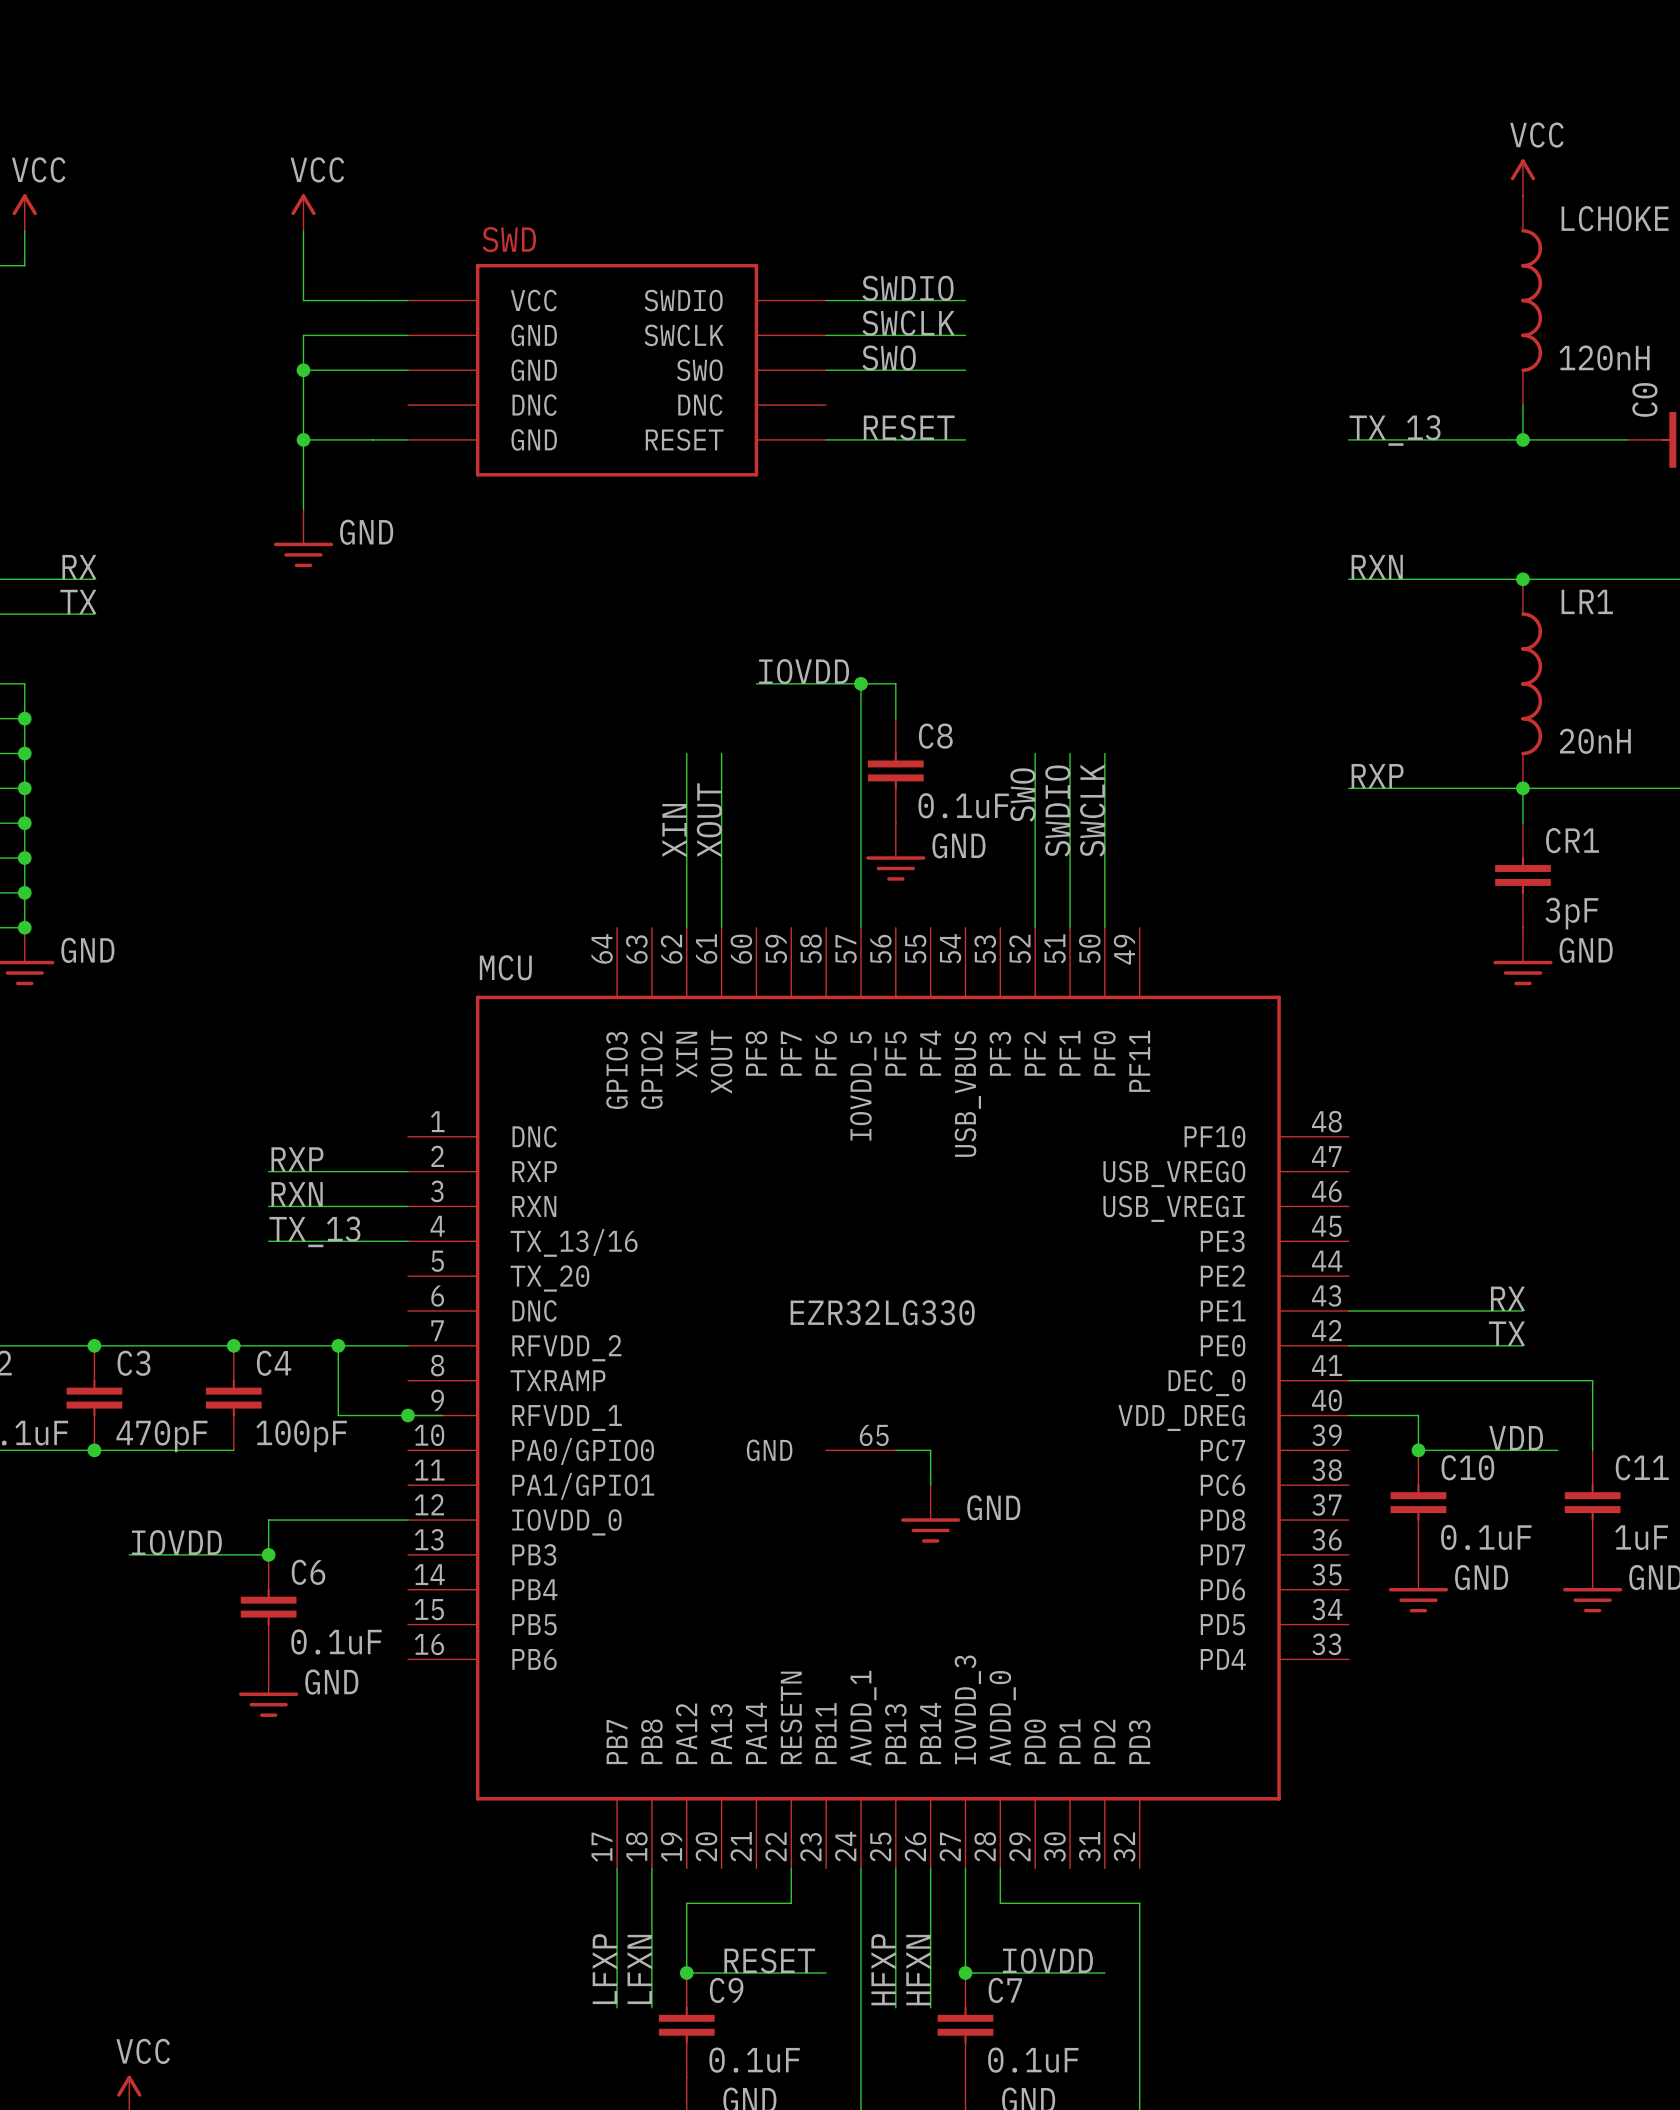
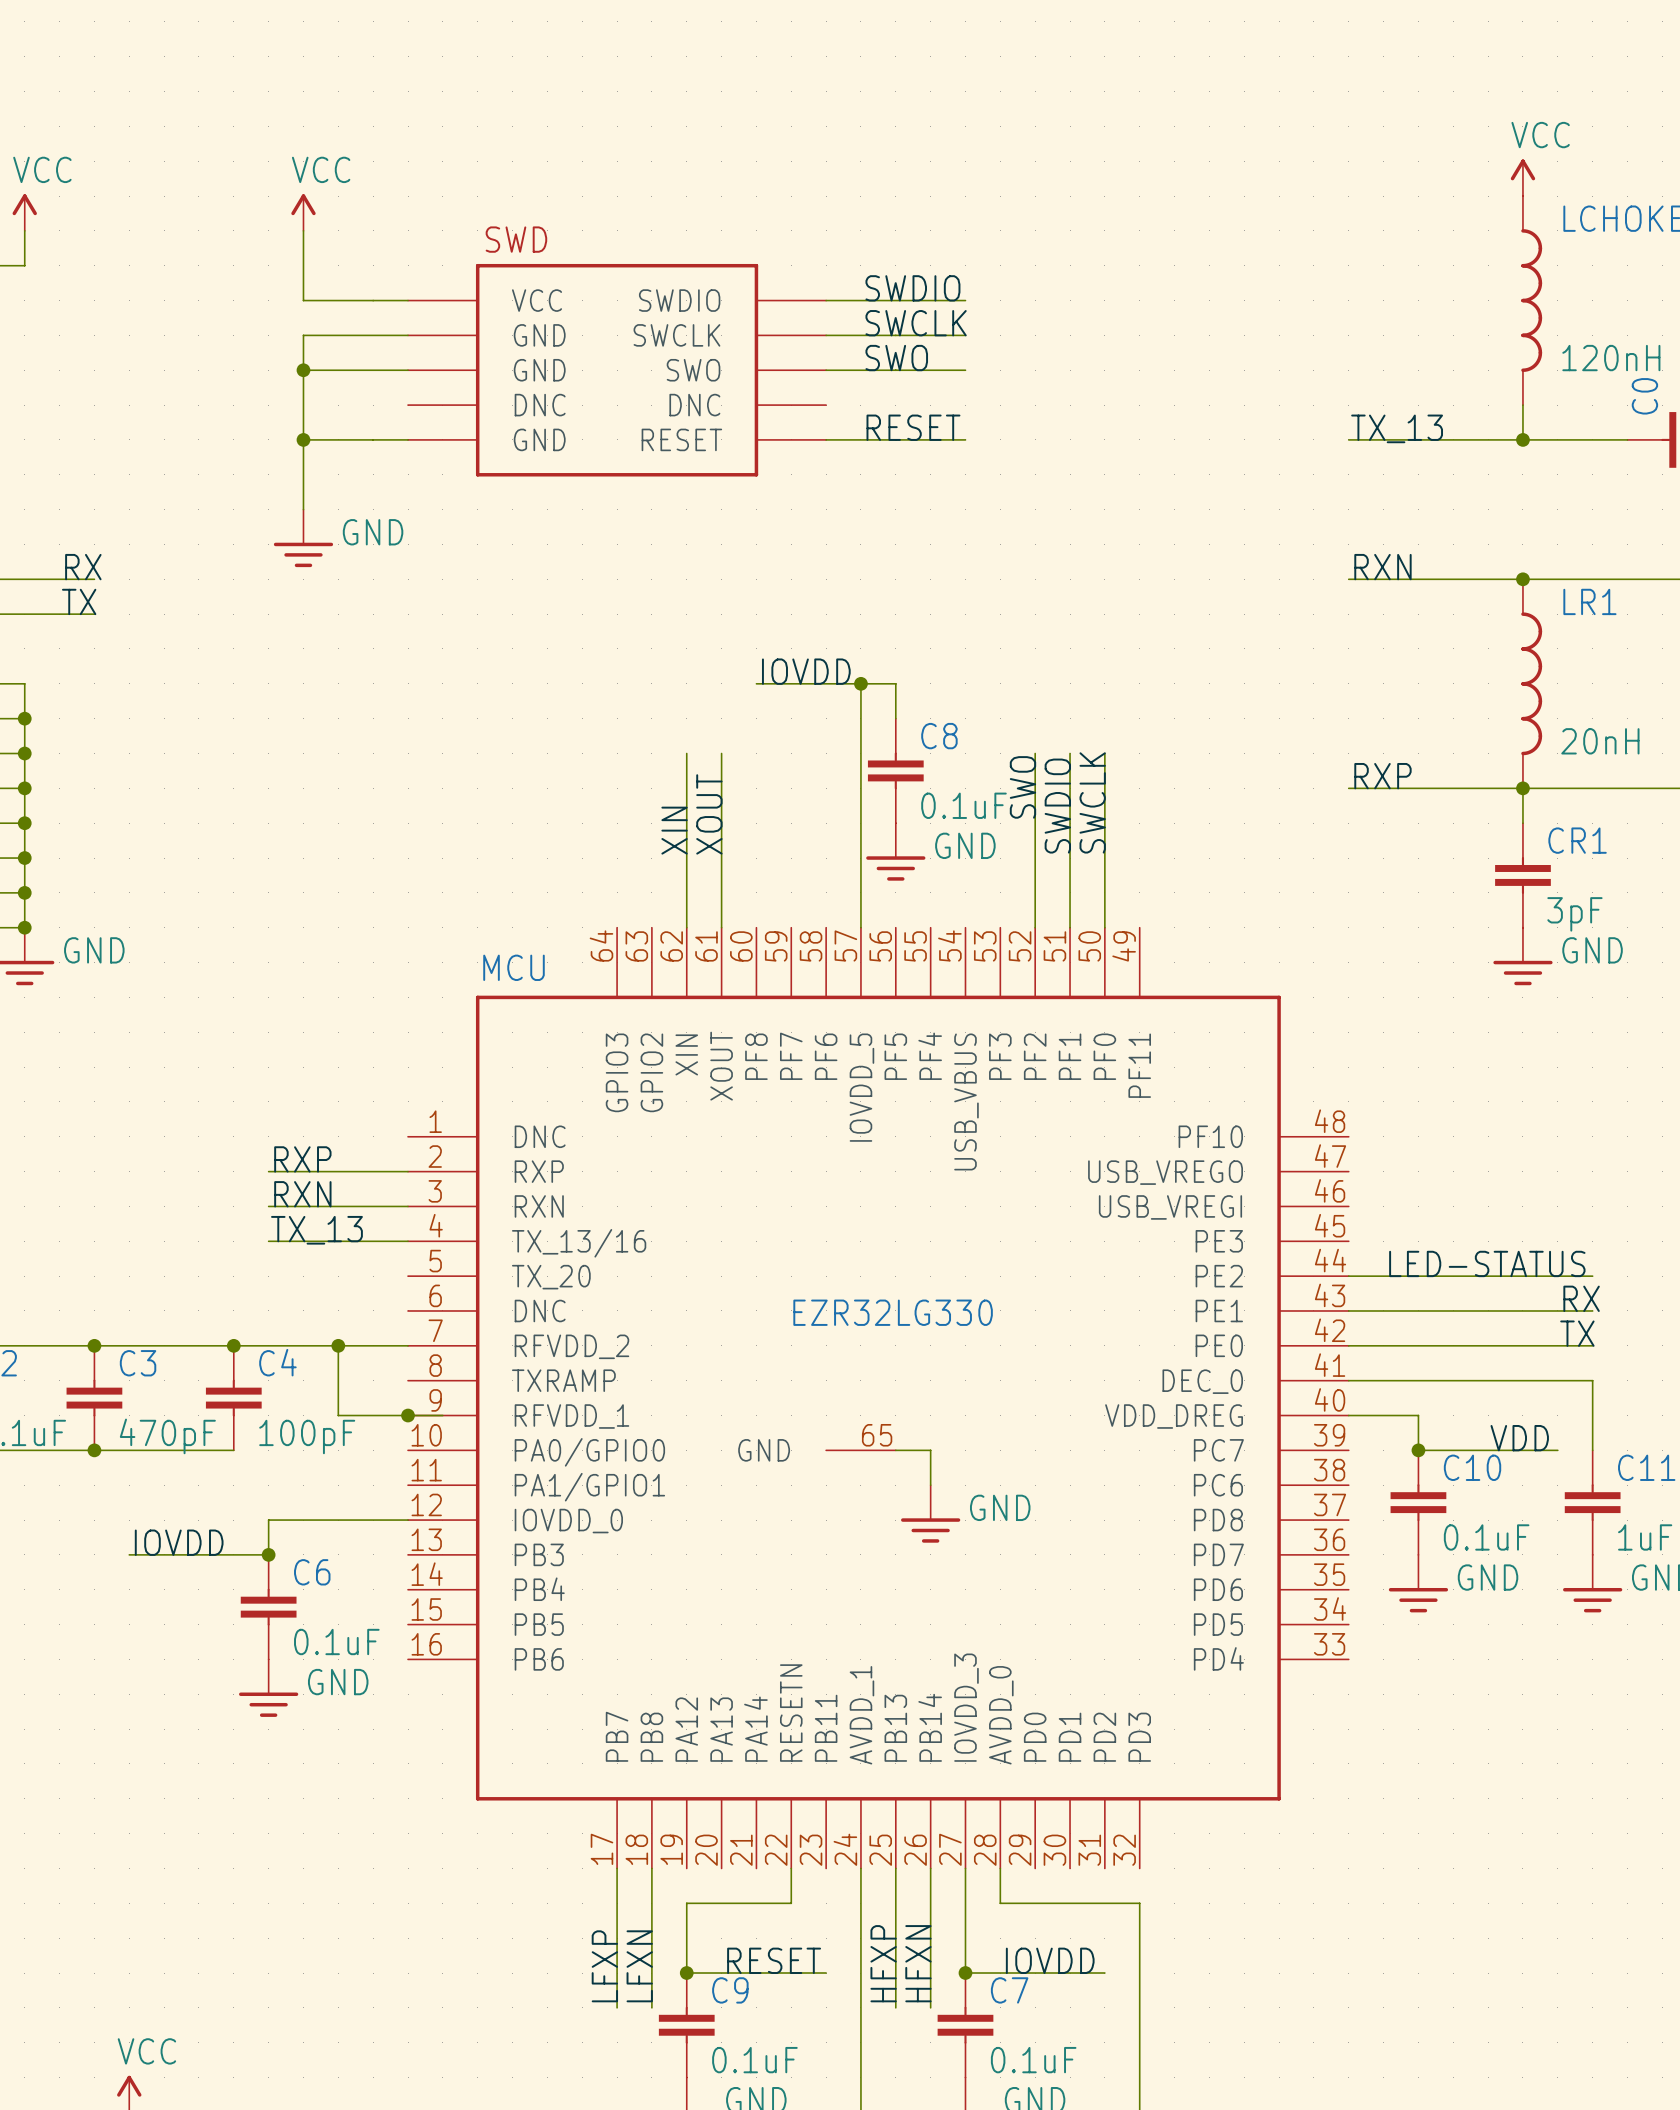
label: none -> LED-STATUS (1487, 1263)
wire: none -> (1348, 1276) (1592, 1276)
label position: RX (1508, 1298) -> RX (1581, 1298)
wire: none -> (1522, 1310) (1592, 1310)
label position: TX (1507, 1333) -> TX (1577, 1333)
wire: none -> (1522, 1345) (1592, 1345)

